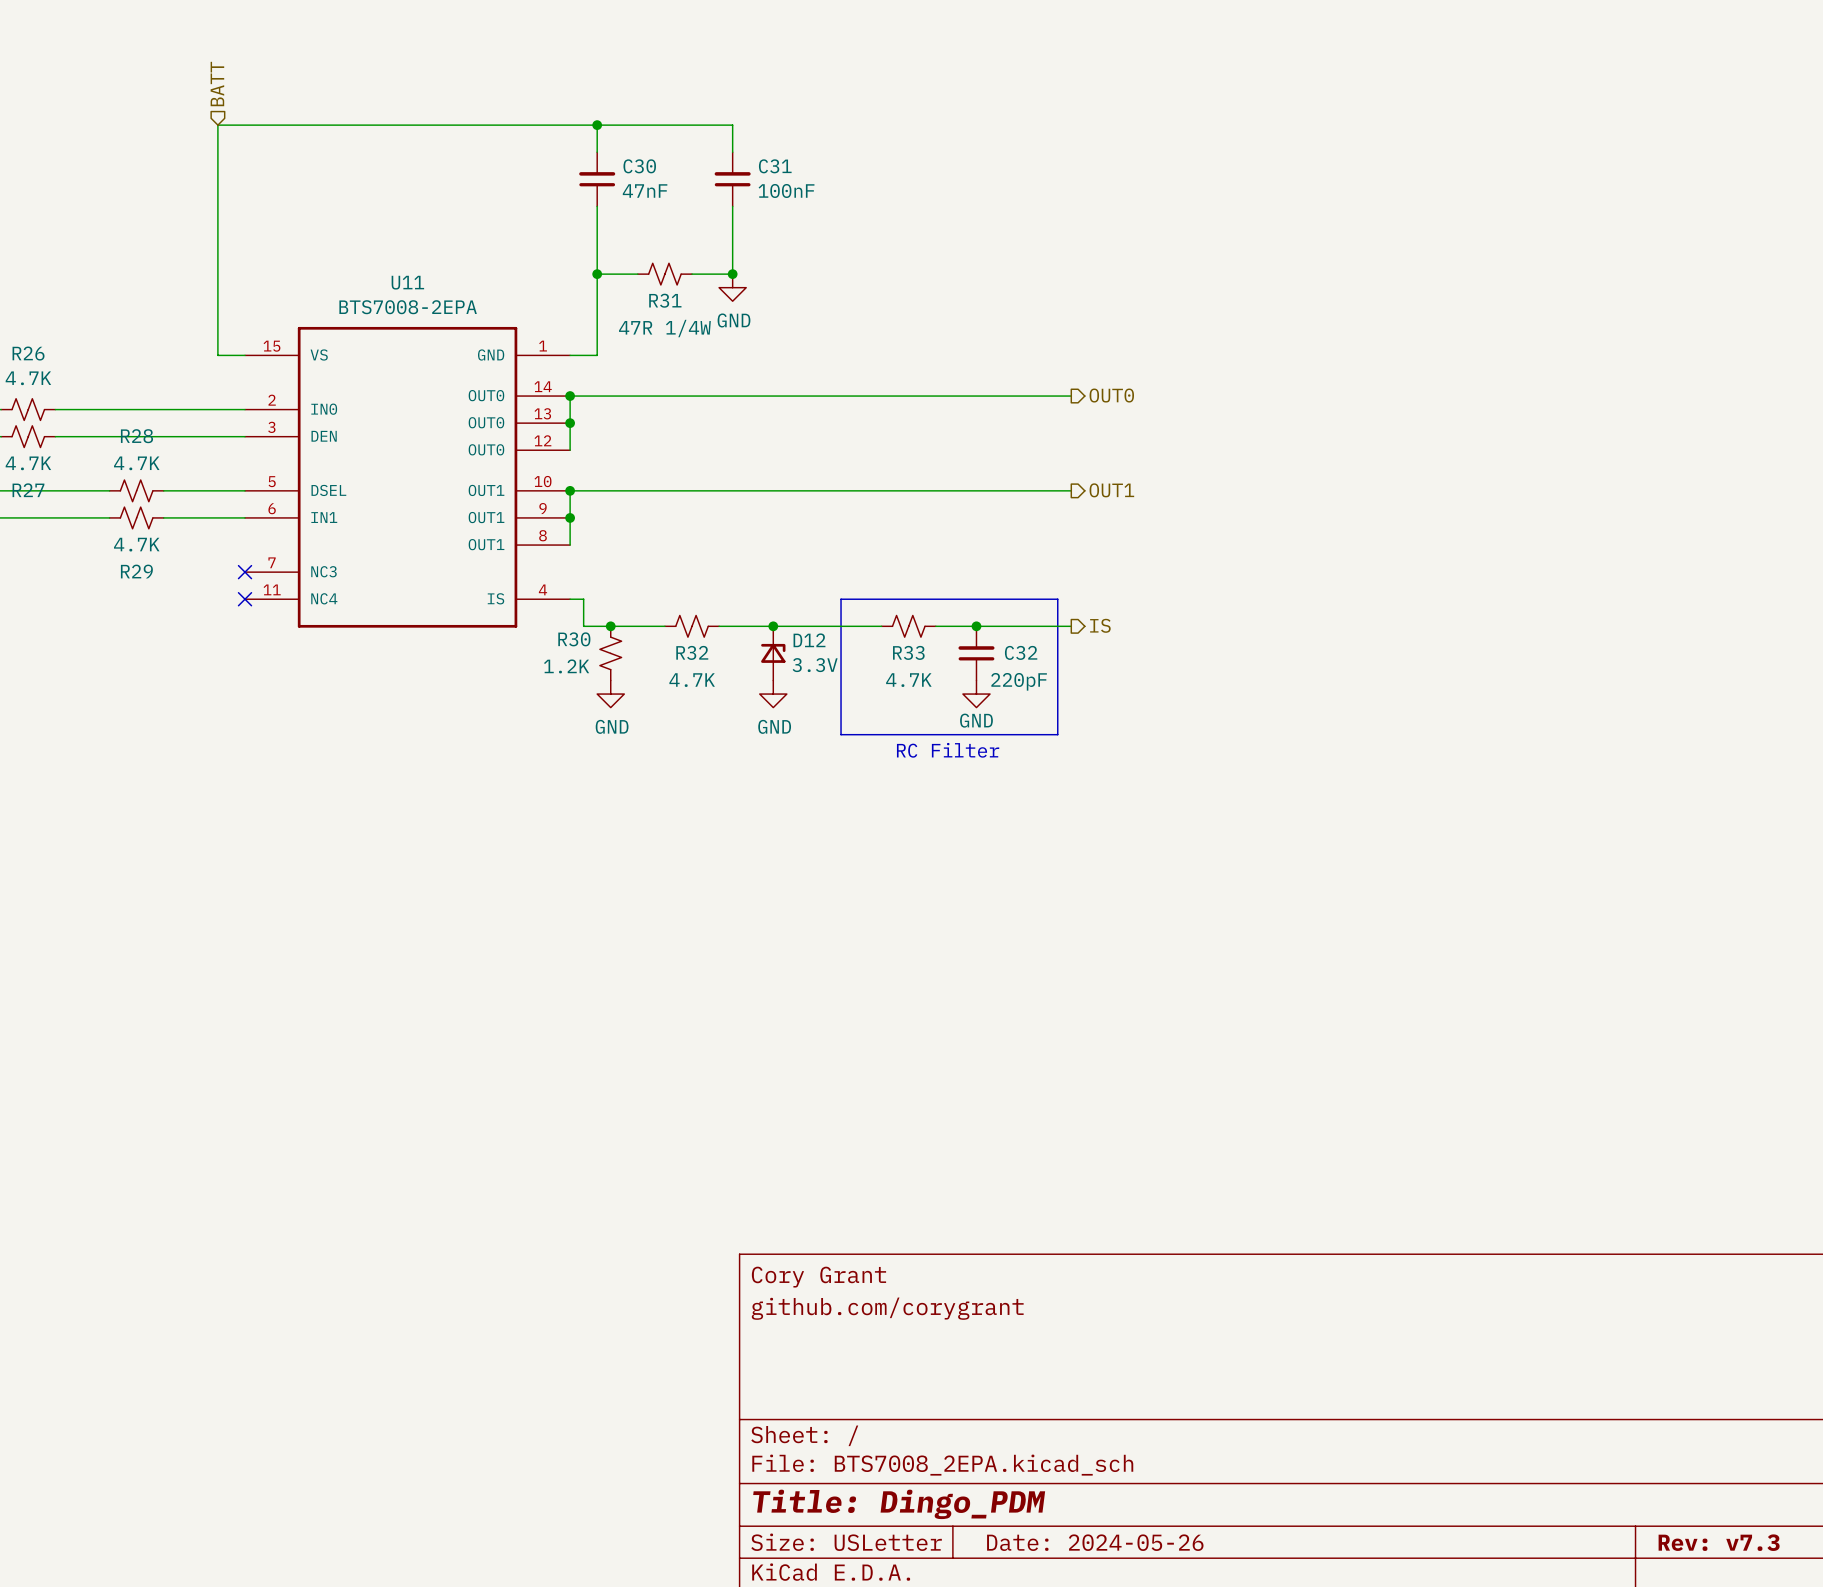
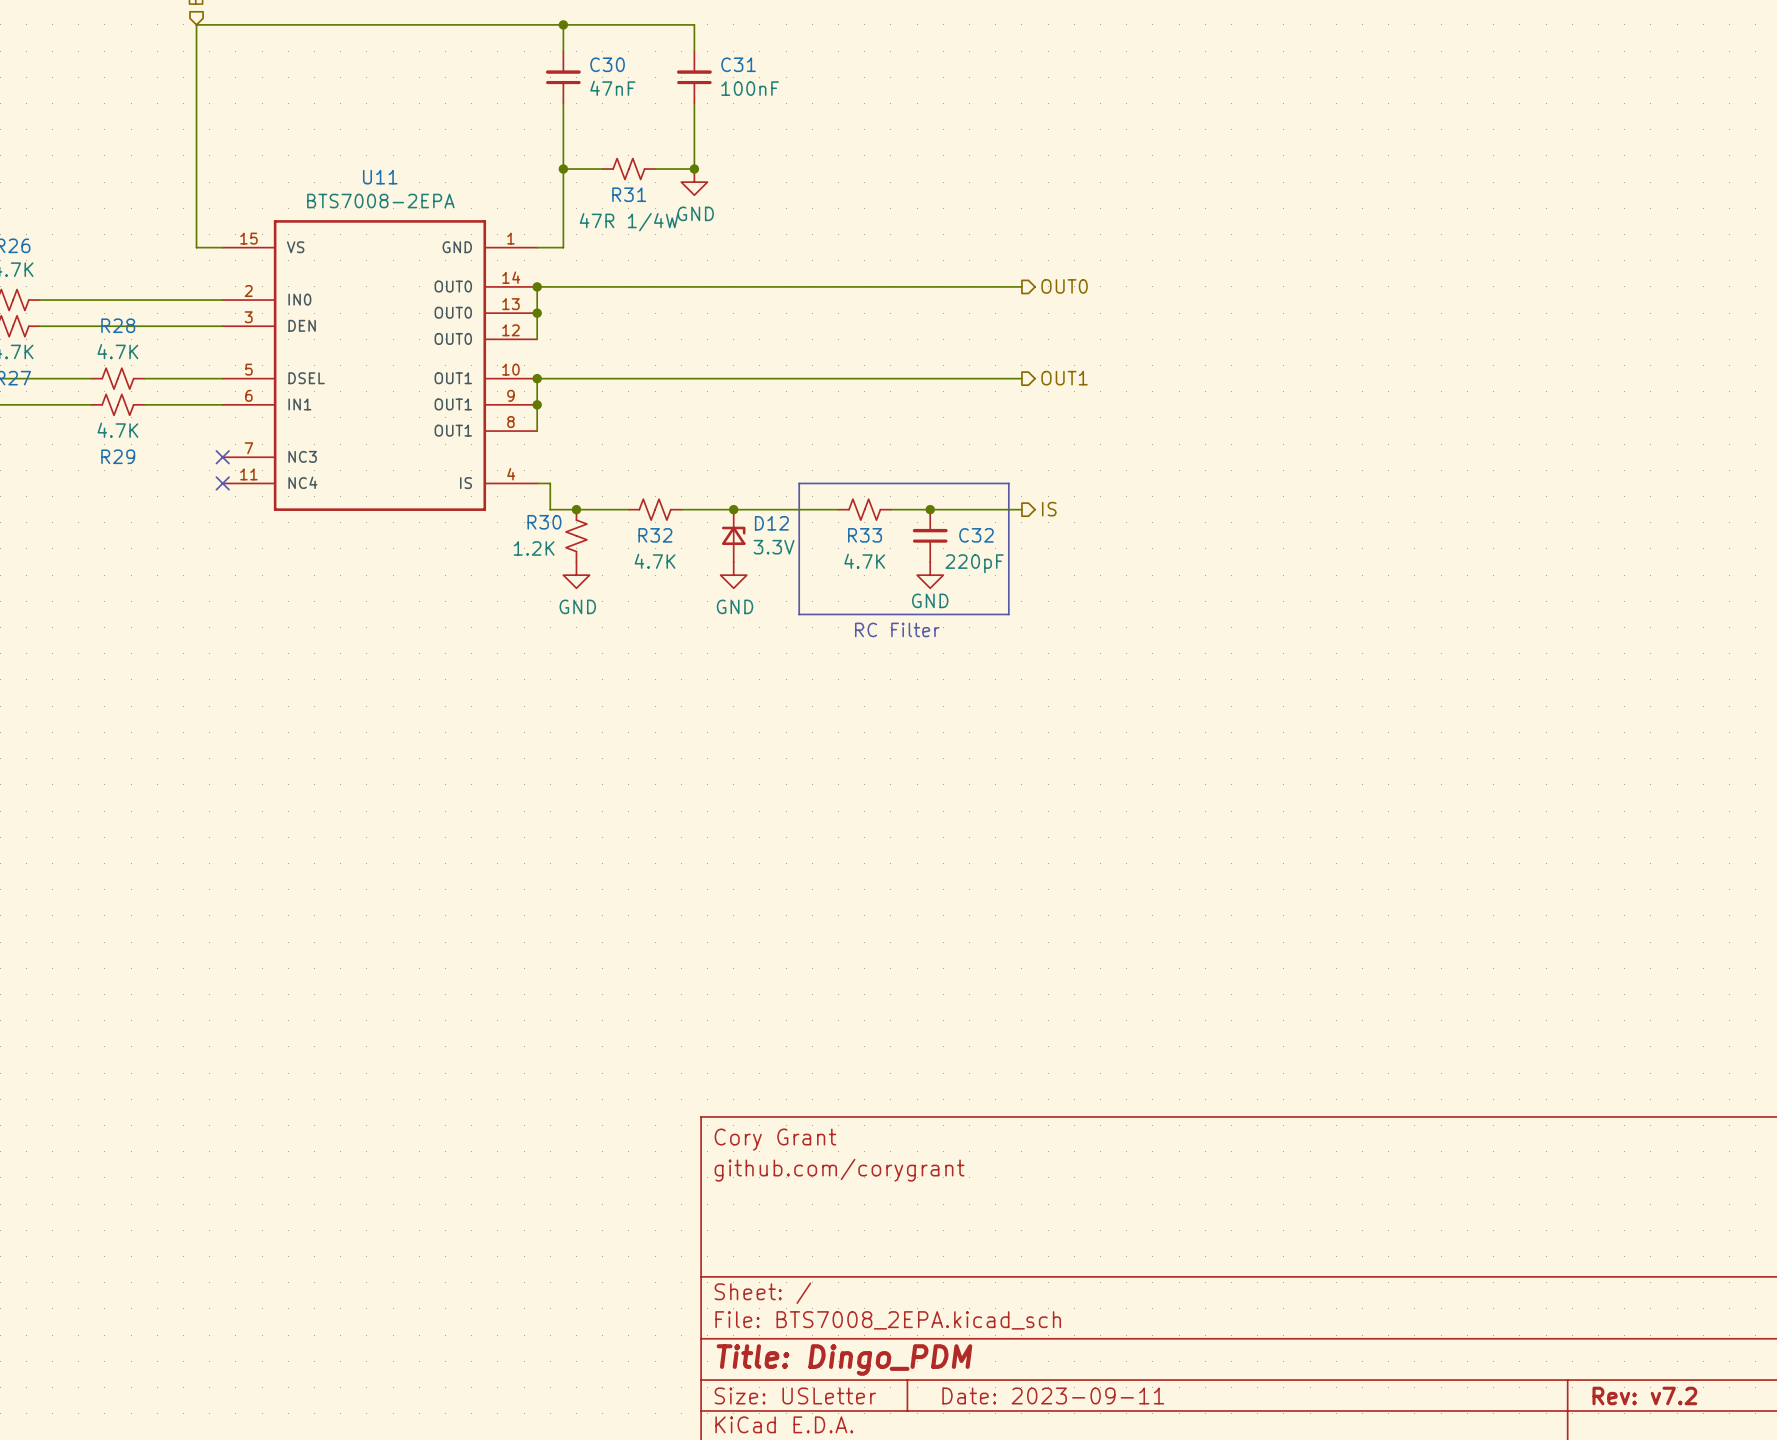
title block: Date: 2024-05-26 (1095, 1542) -> Date: 2023-09-11 (1053, 1395)
title block: Rev: v7.3 (1719, 1542) -> Rev: v7.2 (1644, 1395)

